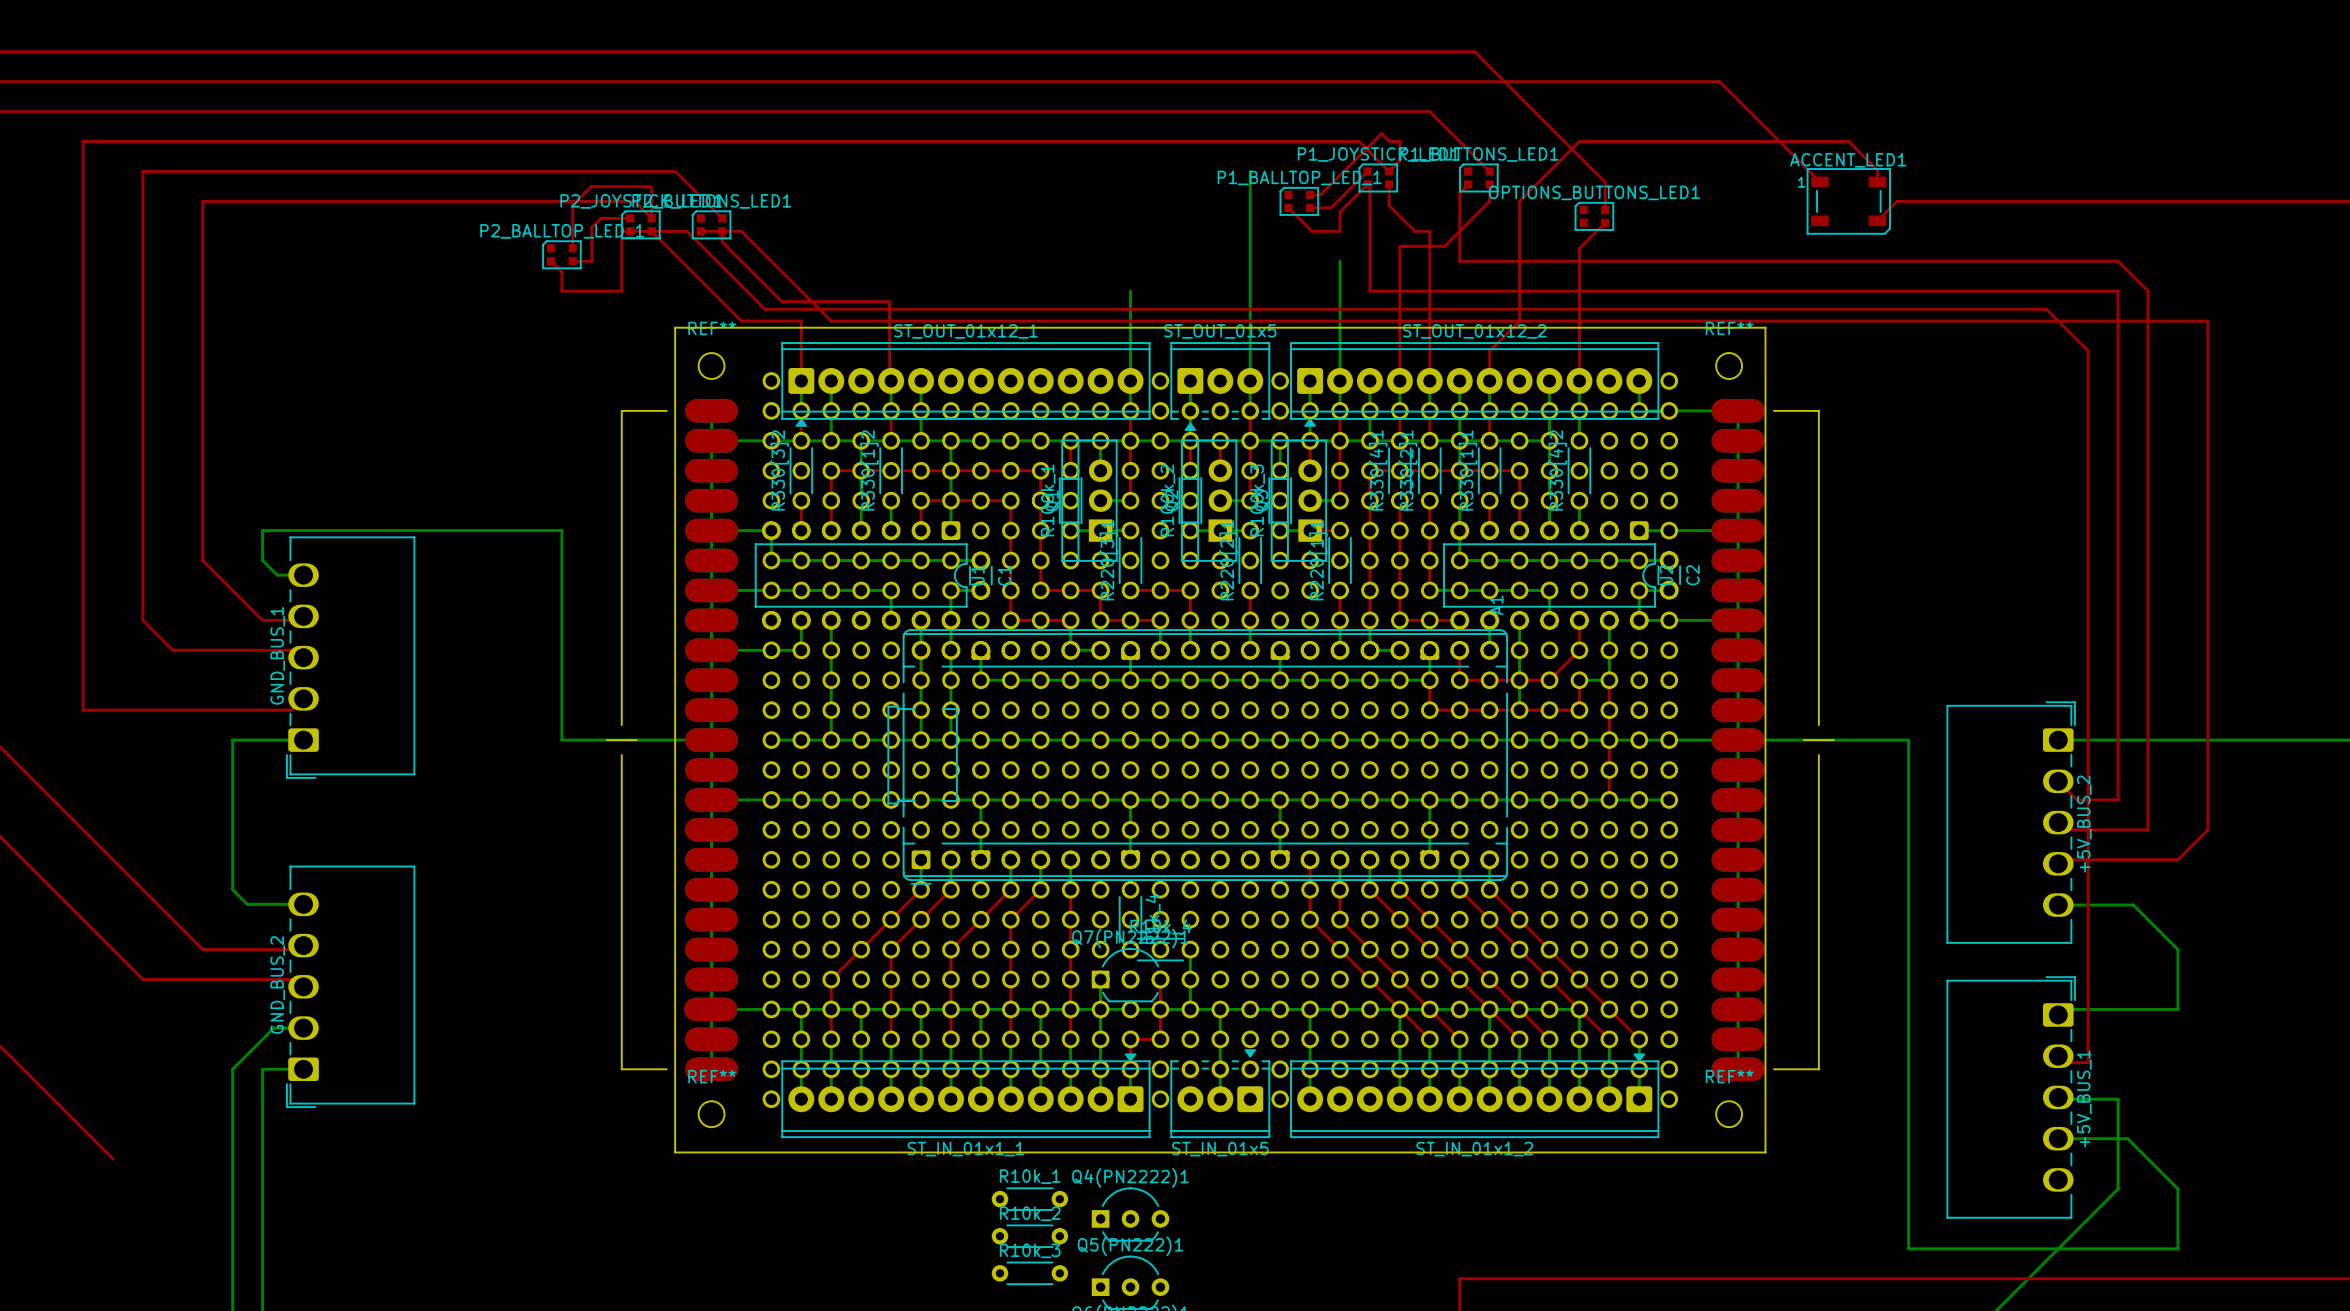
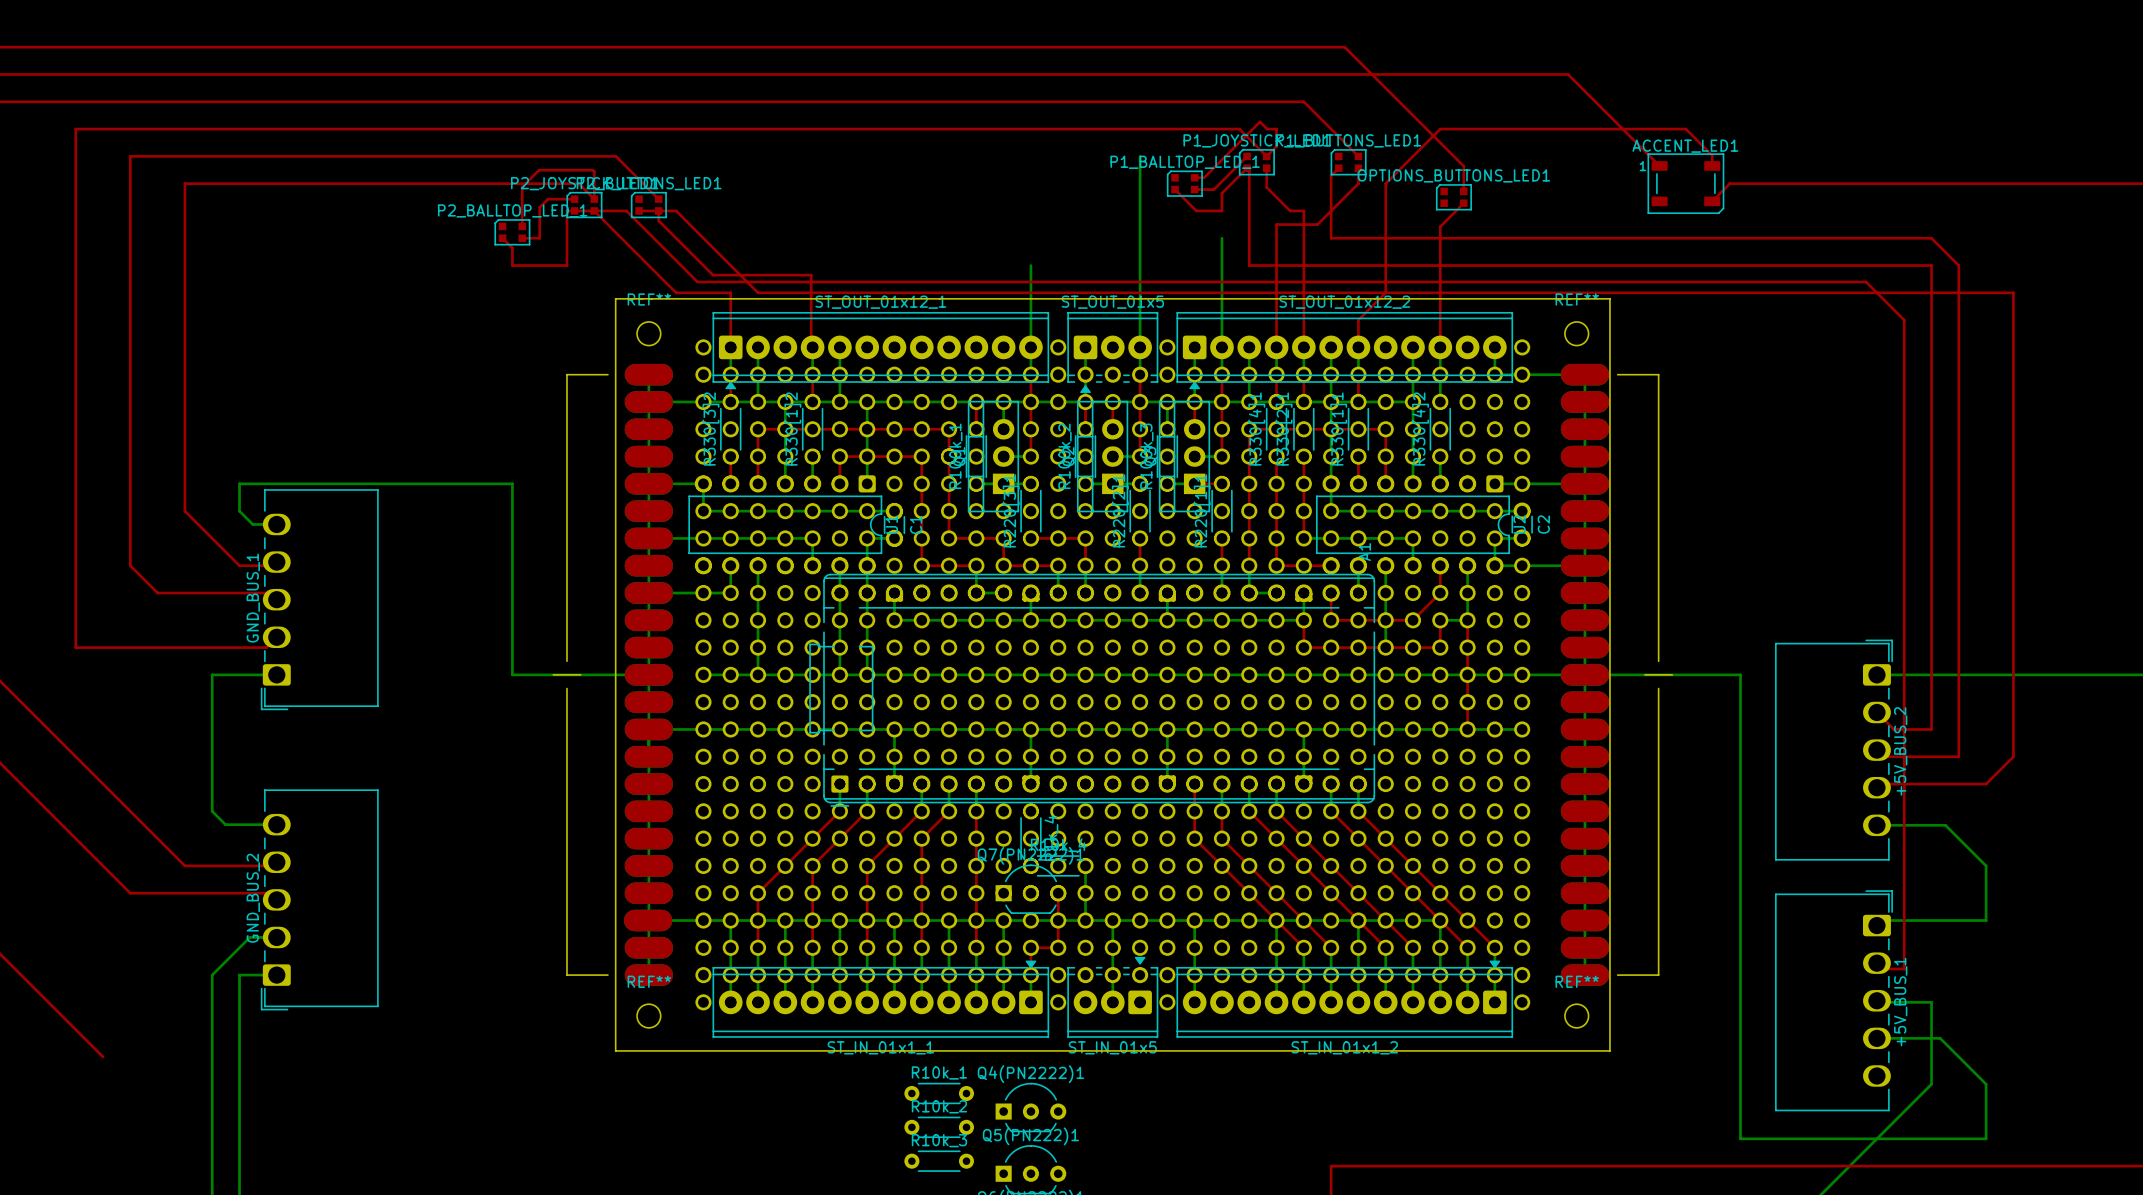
bottom track: (1100, 979) (1100, 1009) -> none

